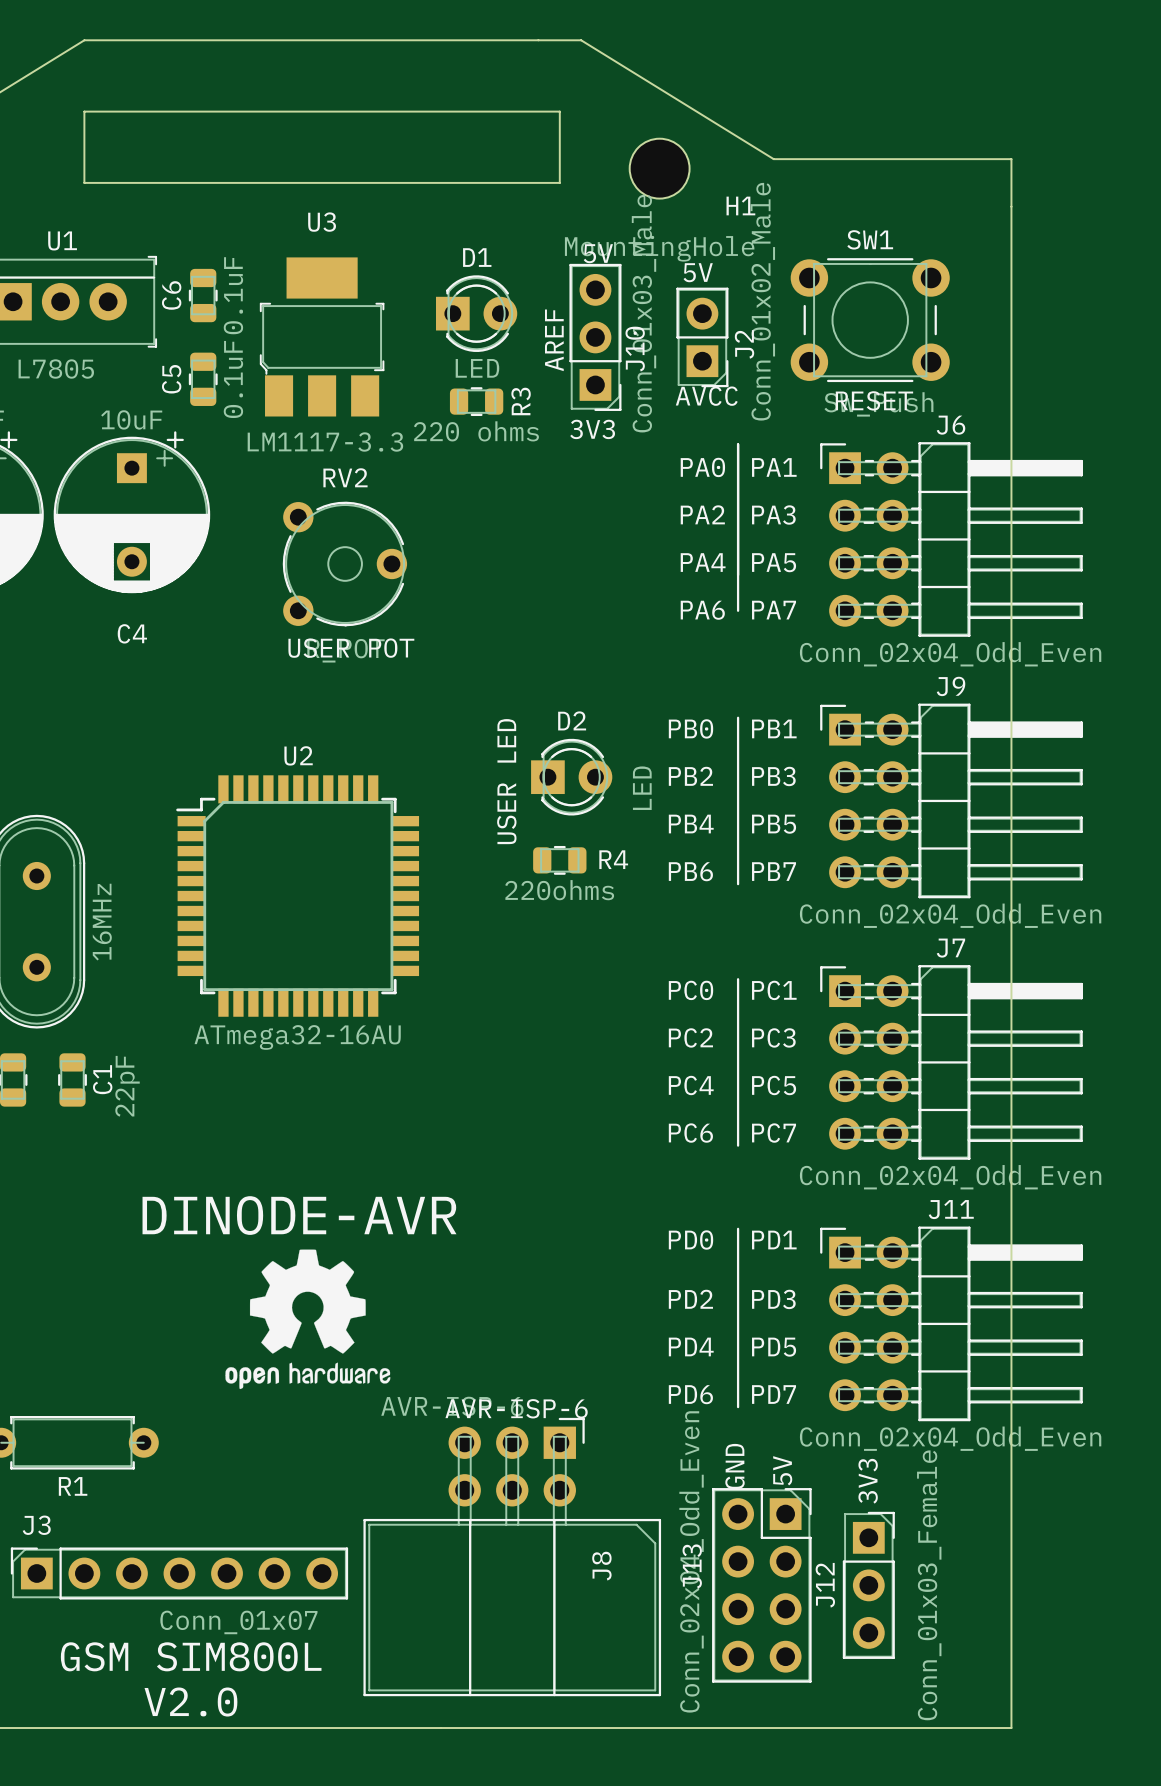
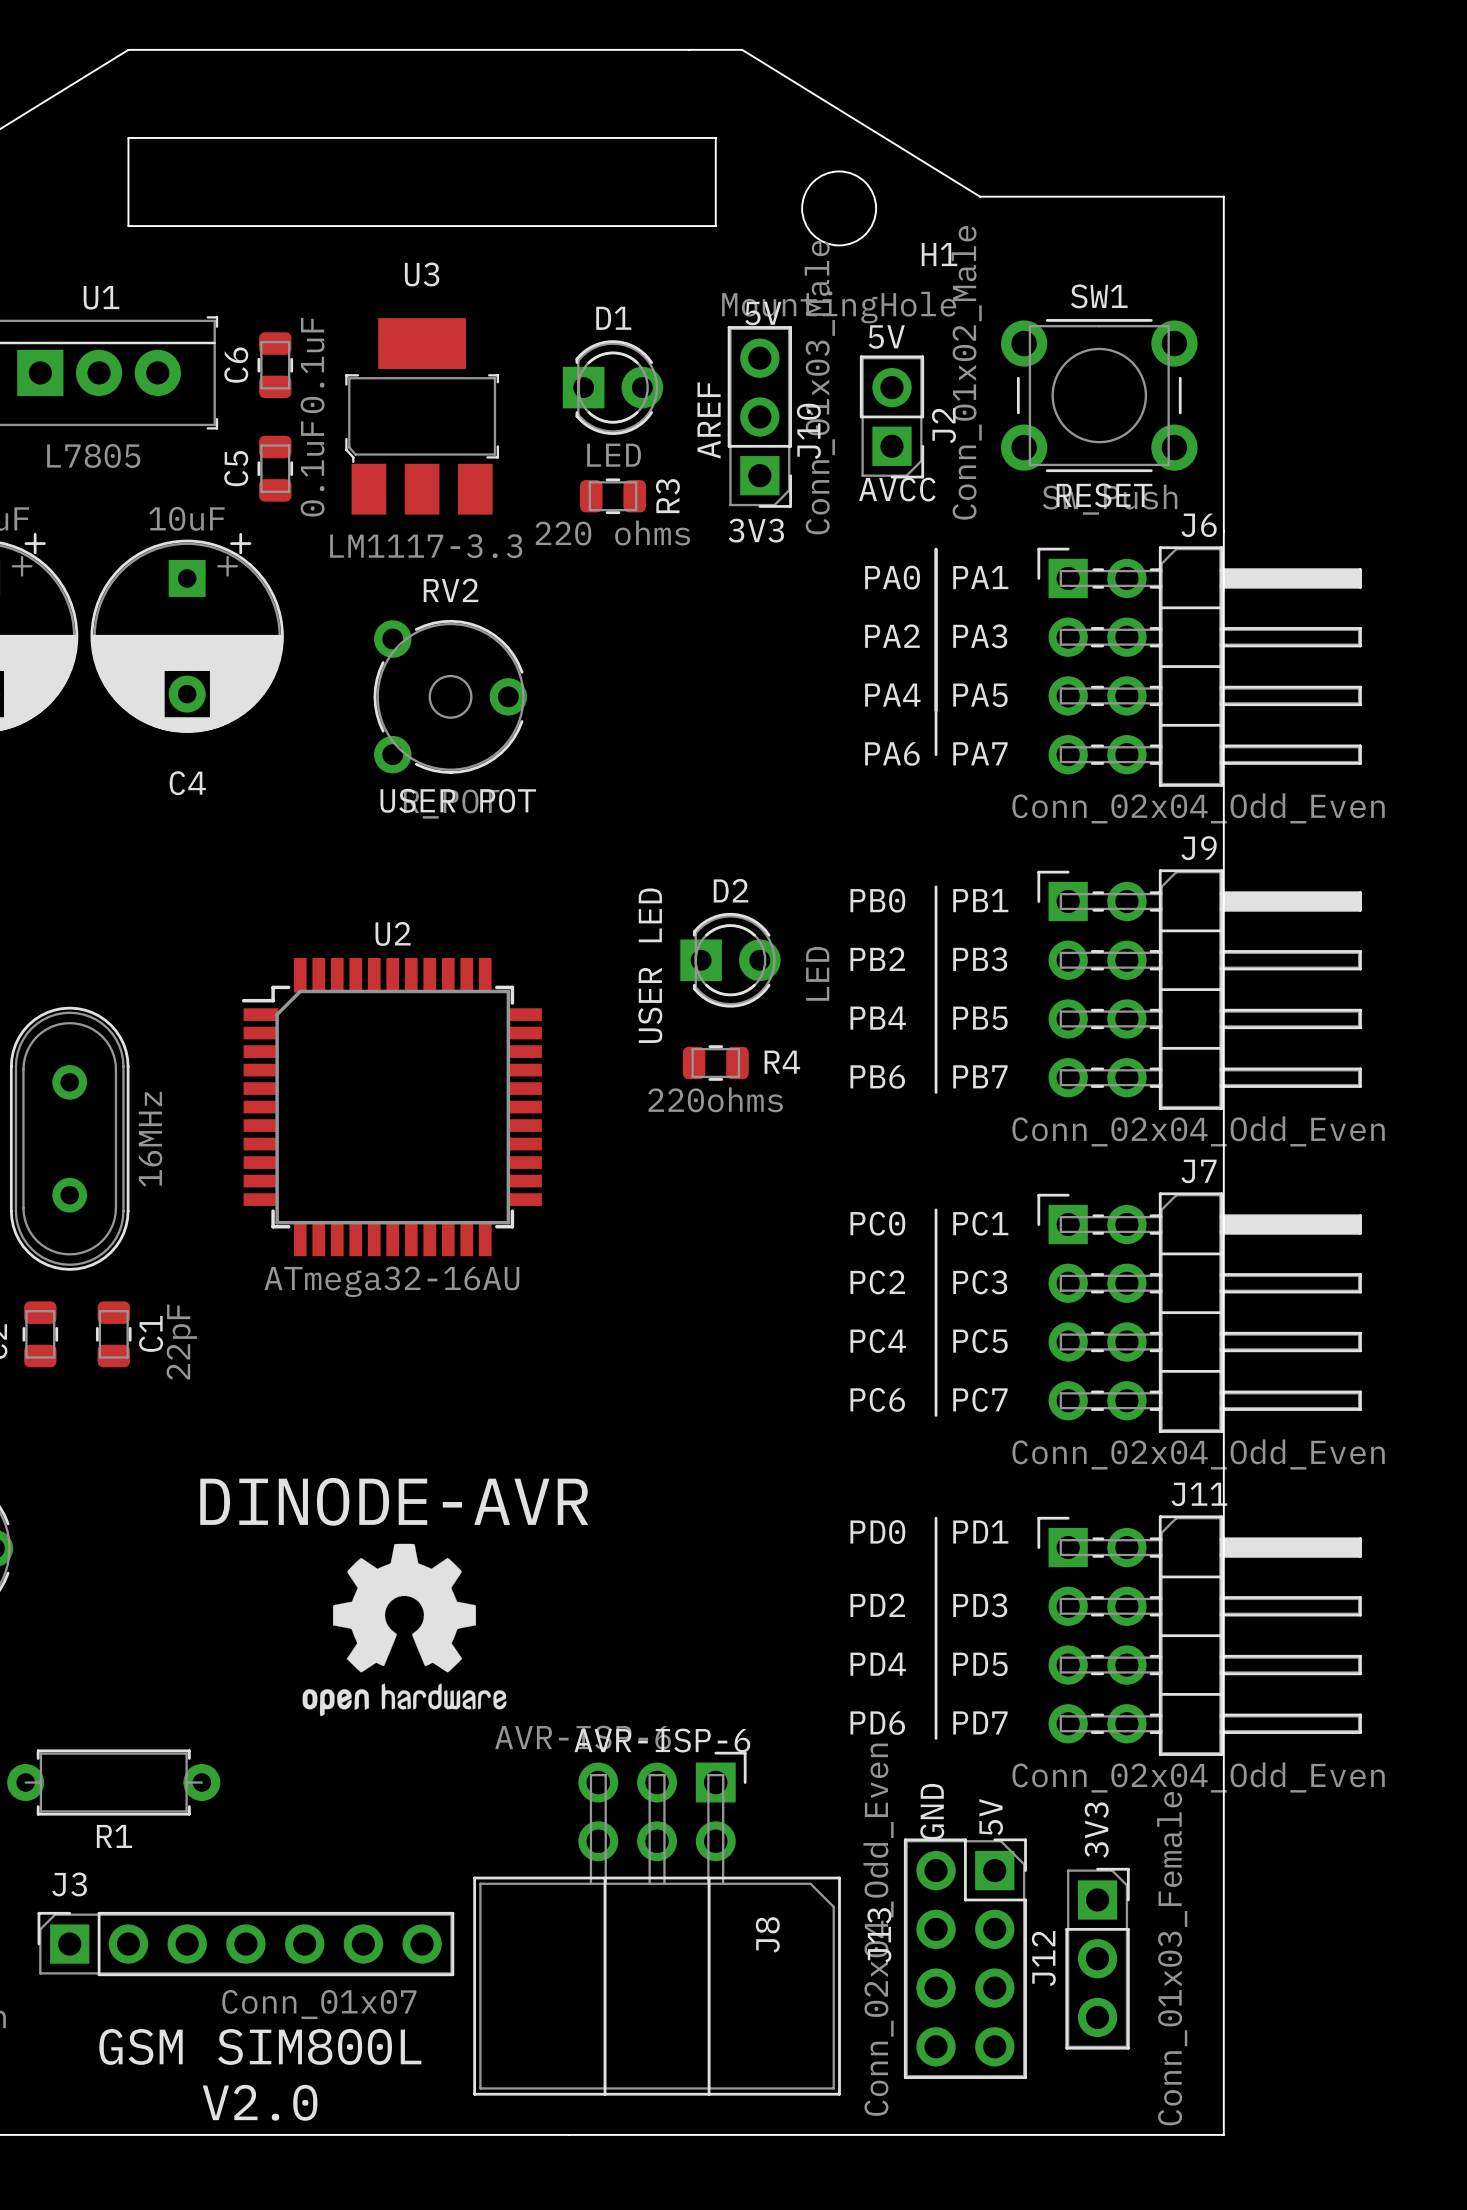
board edge: (971, 159) (1011, 159) (1011, 1728) (971, 1728) -> (1223, 196) (1223, 2134)

